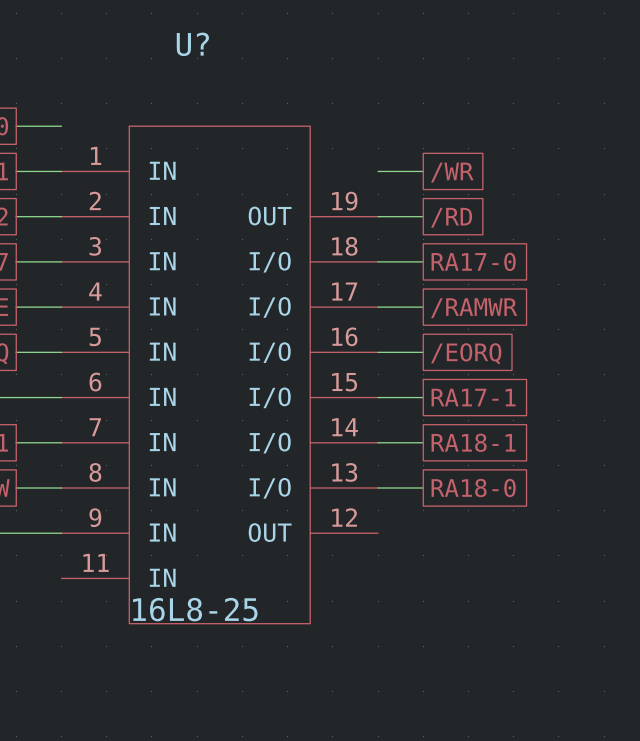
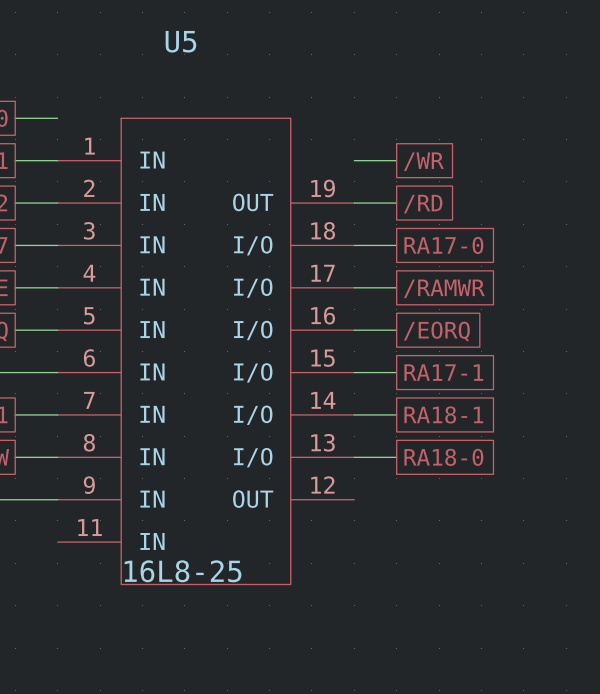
U? name: U? (192, 44) -> U5 (180, 41)

